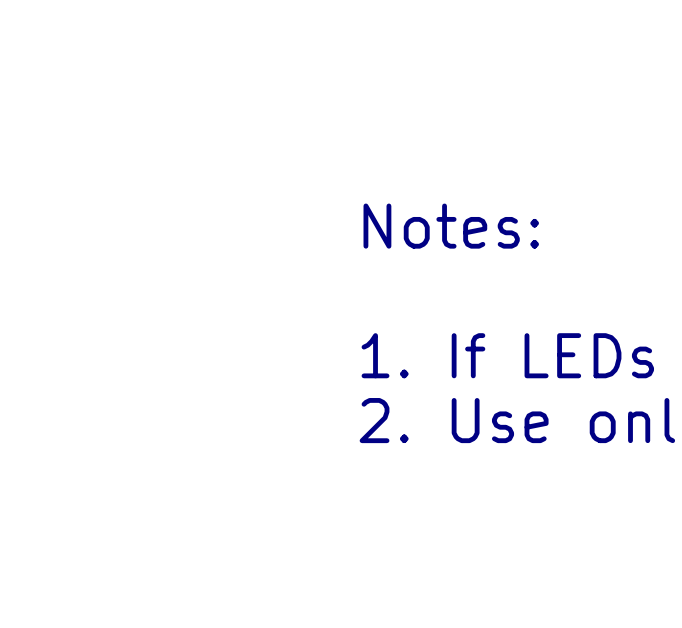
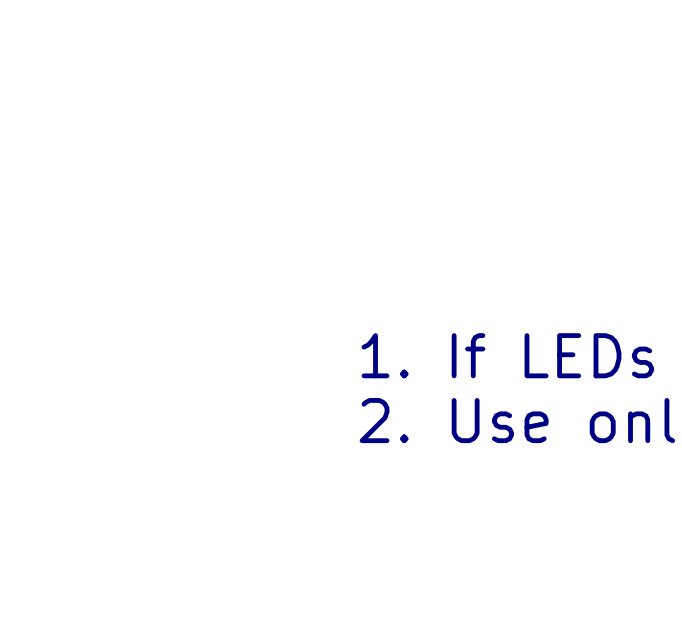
text: Notes: (451, 226) -> none

